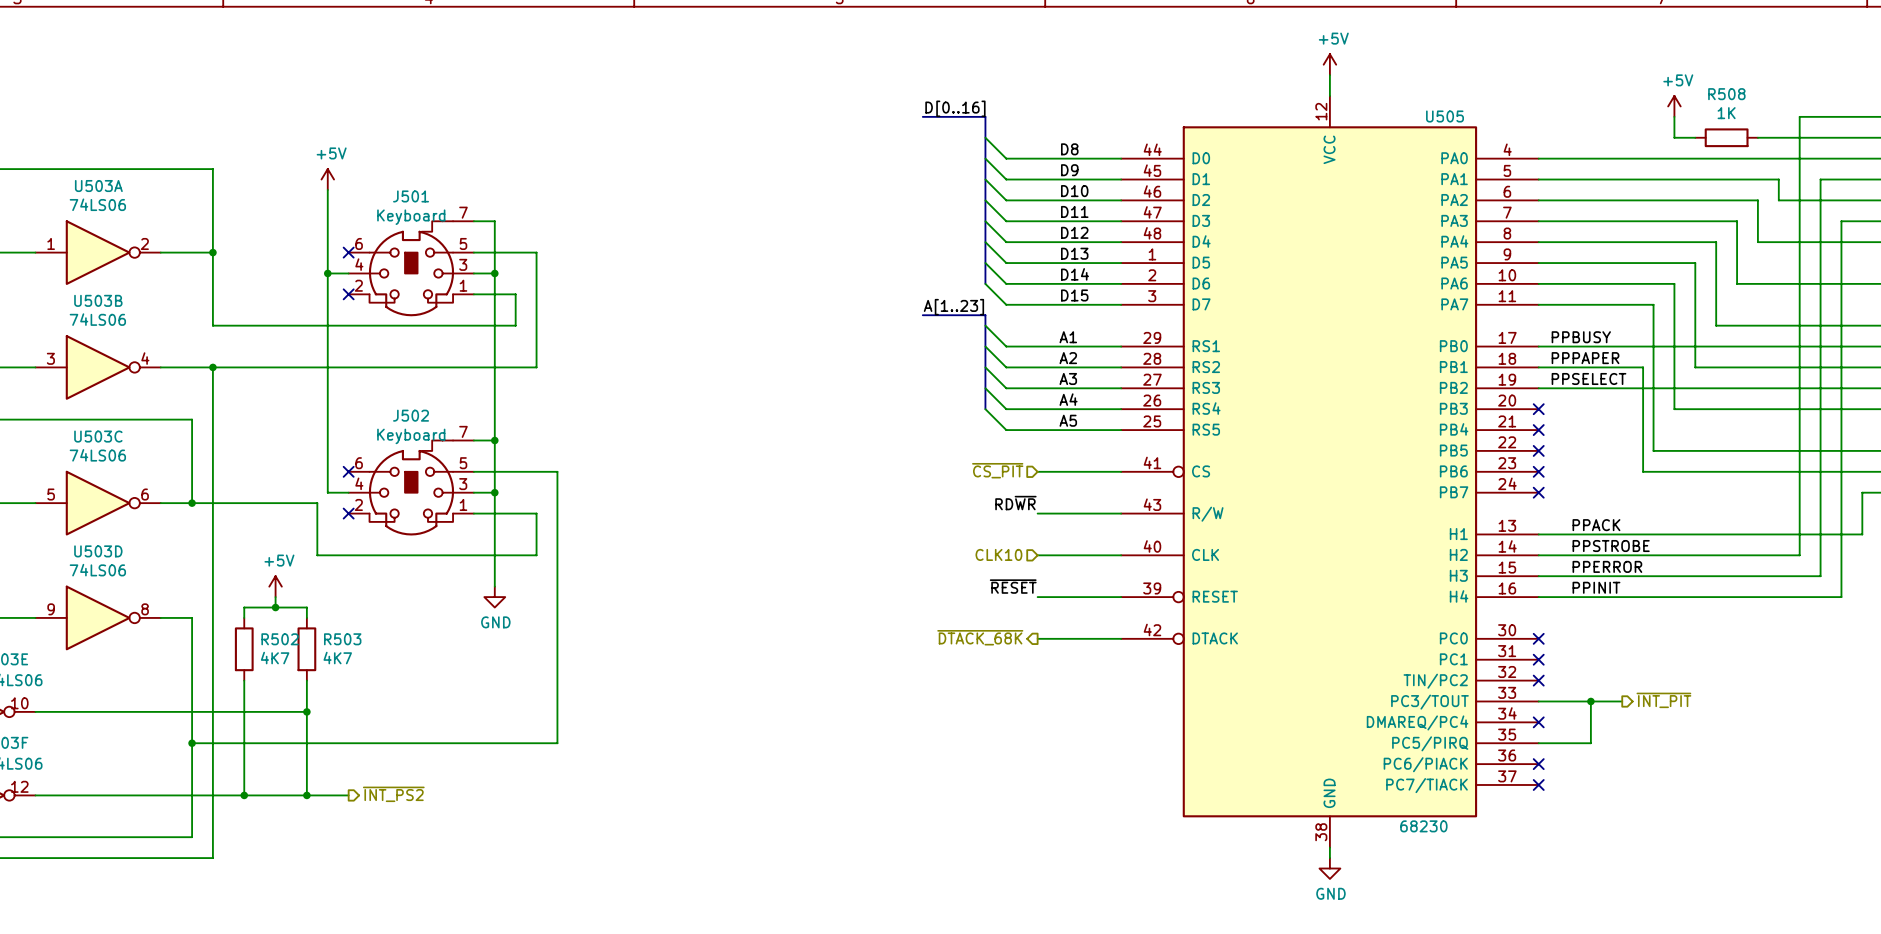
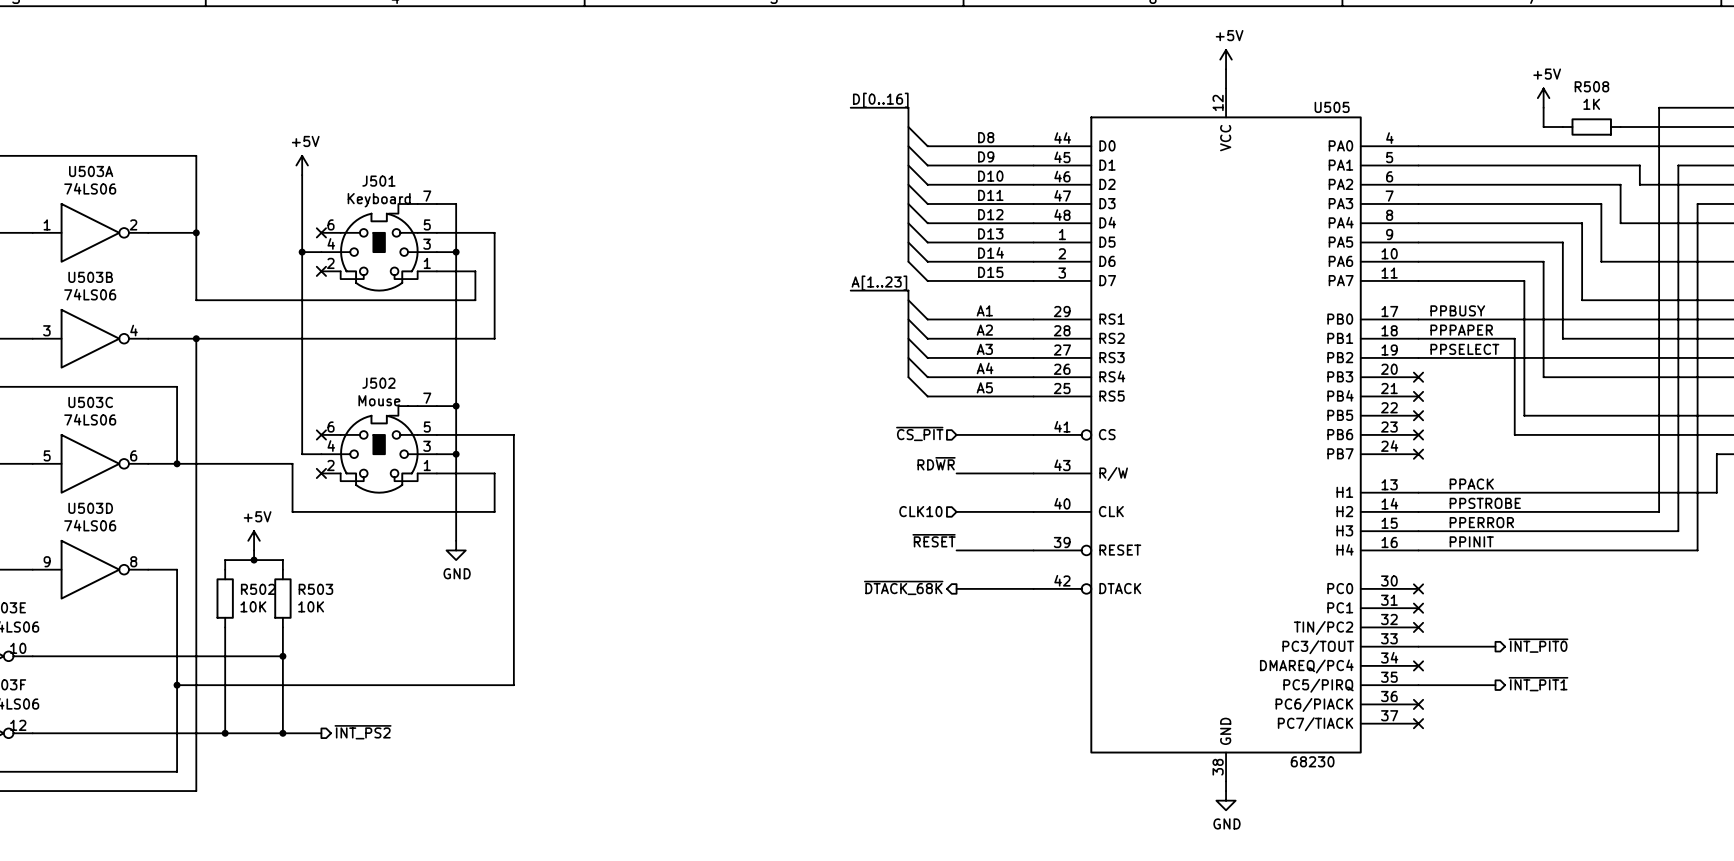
J502 value: Keyboard (411, 436) -> Mouse (379, 400)
R502 value: 4K7 (275, 658) -> 10K (253, 606)
R503 value: 4K7 (337, 658) -> 10K (311, 606)
hierarchical label: ~{INT_PIT} (1663, 700) -> ~{INT_PIT0} (1538, 645)
wire: (1590, 701) (1590, 743) -> (1495, 685) (1466, 685)
junction: (1590, 701) -> none
hierarchical label: none -> ~{INT_PIT1} (1538, 684)

